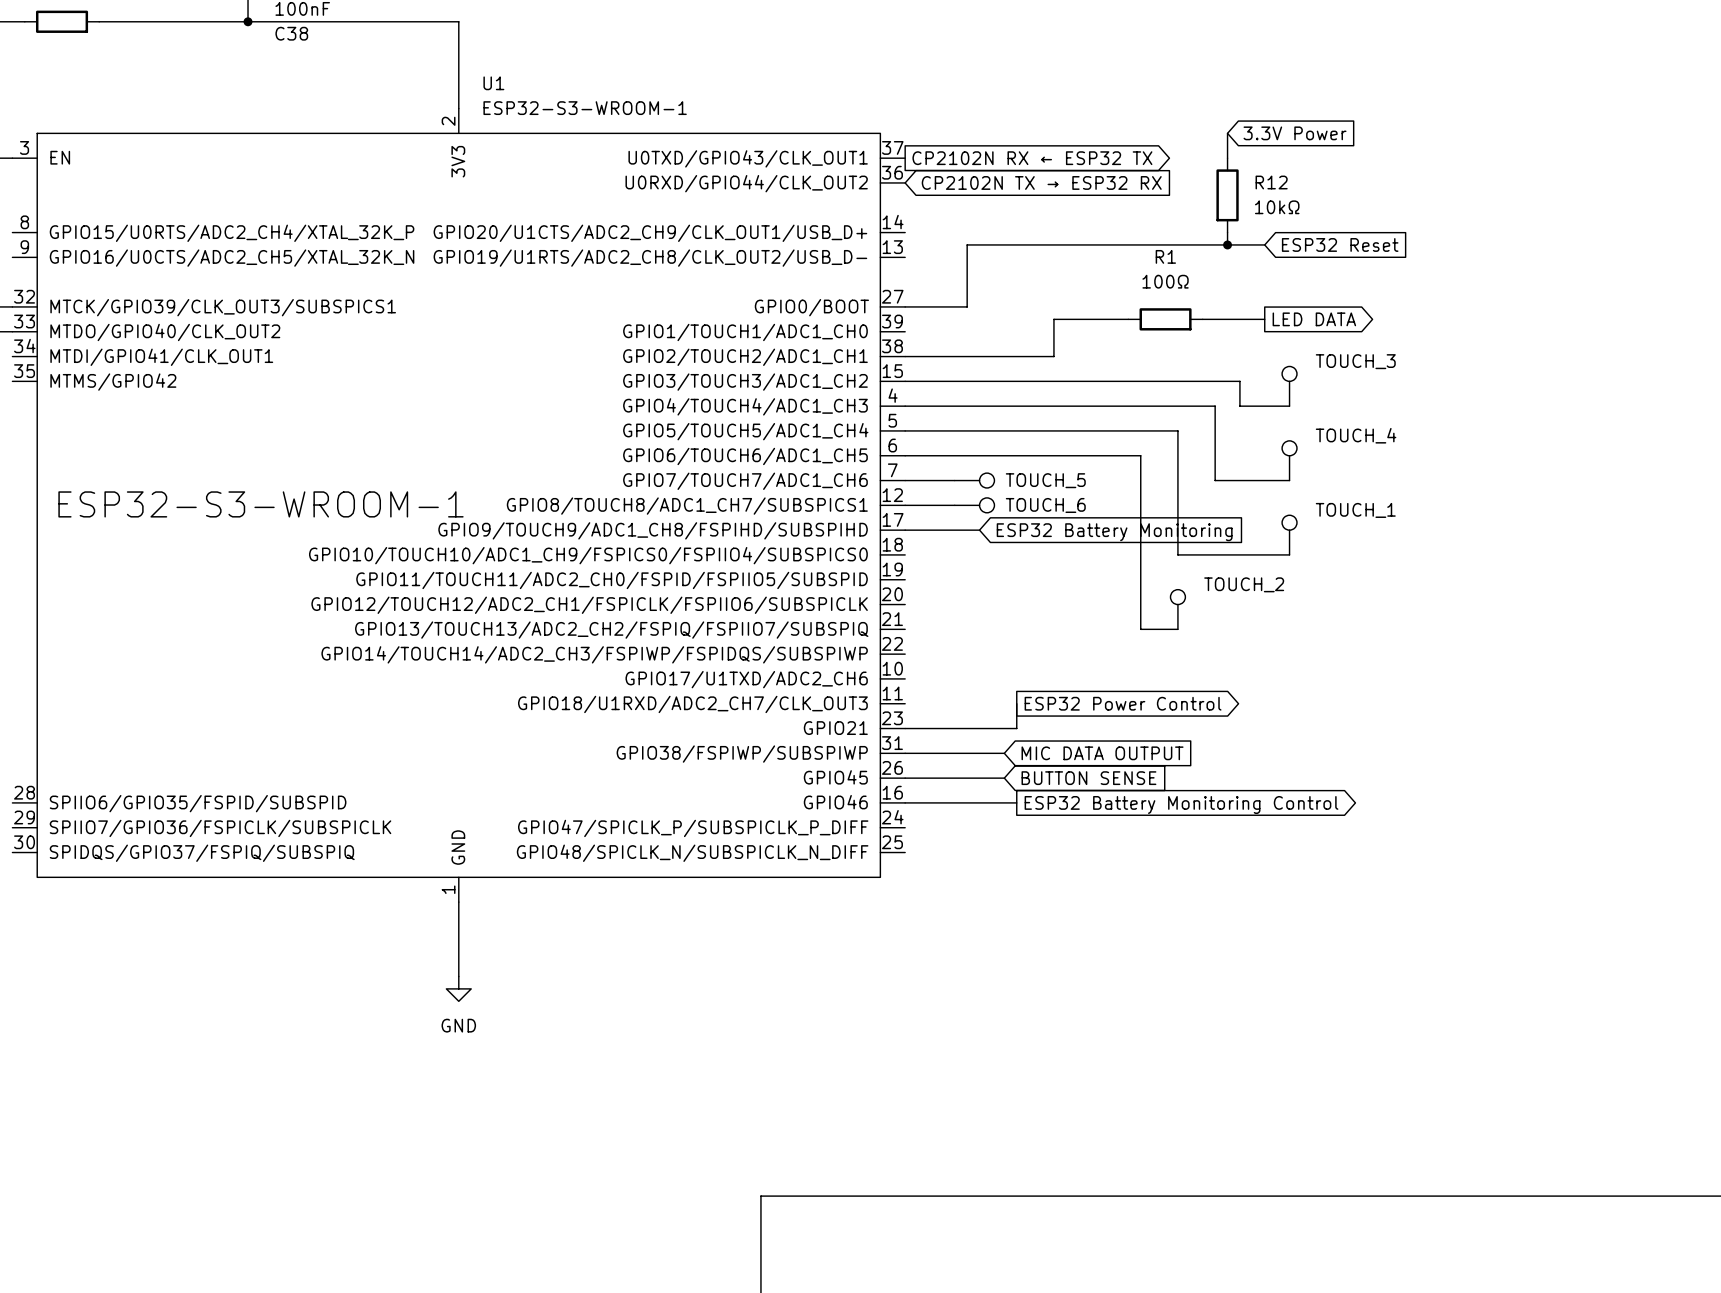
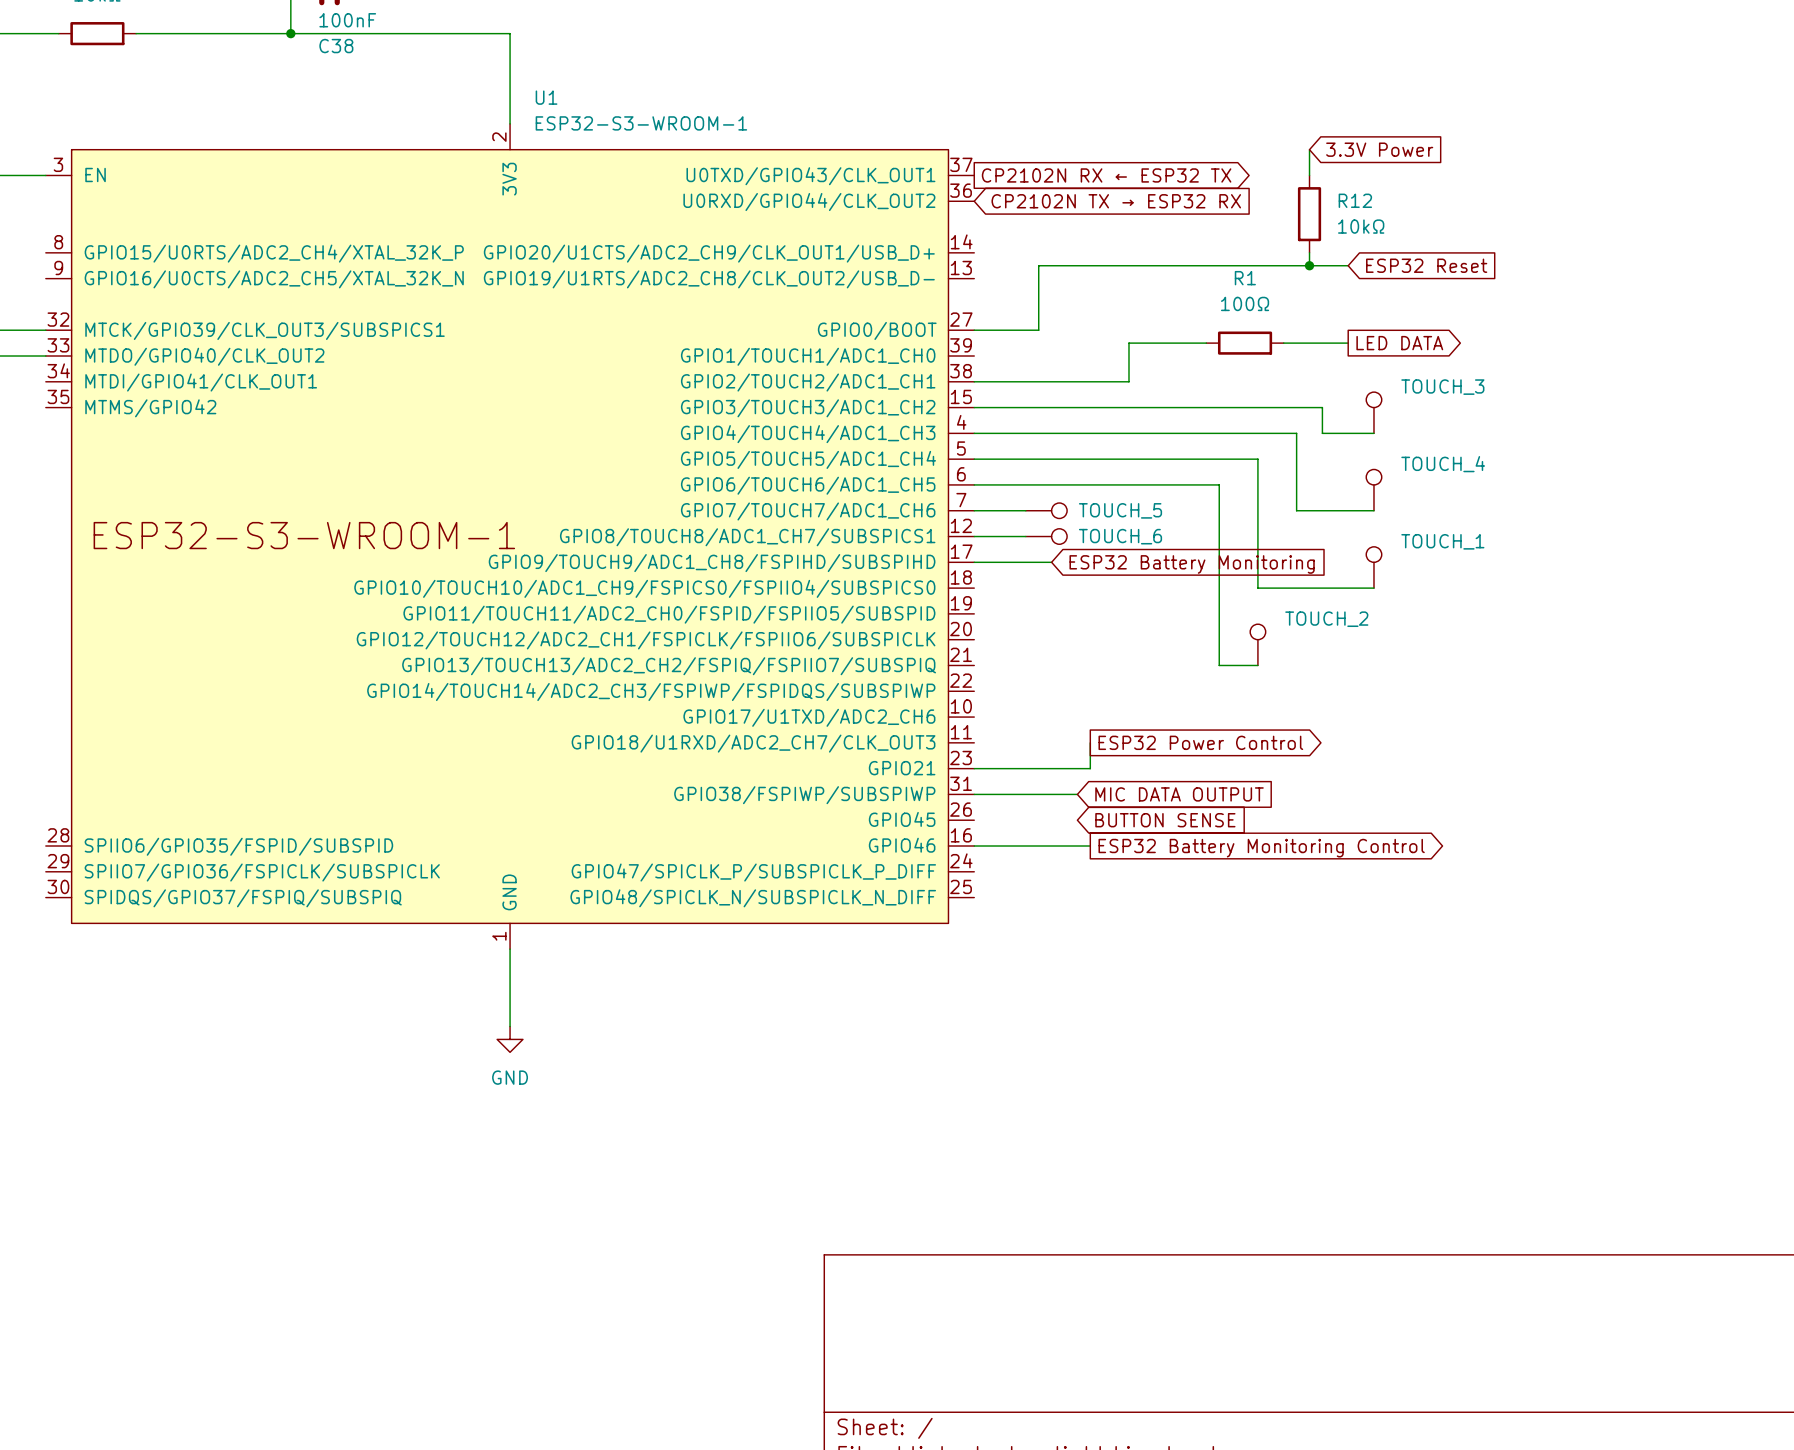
wire: (905, 778) (1004, 778) -> none

